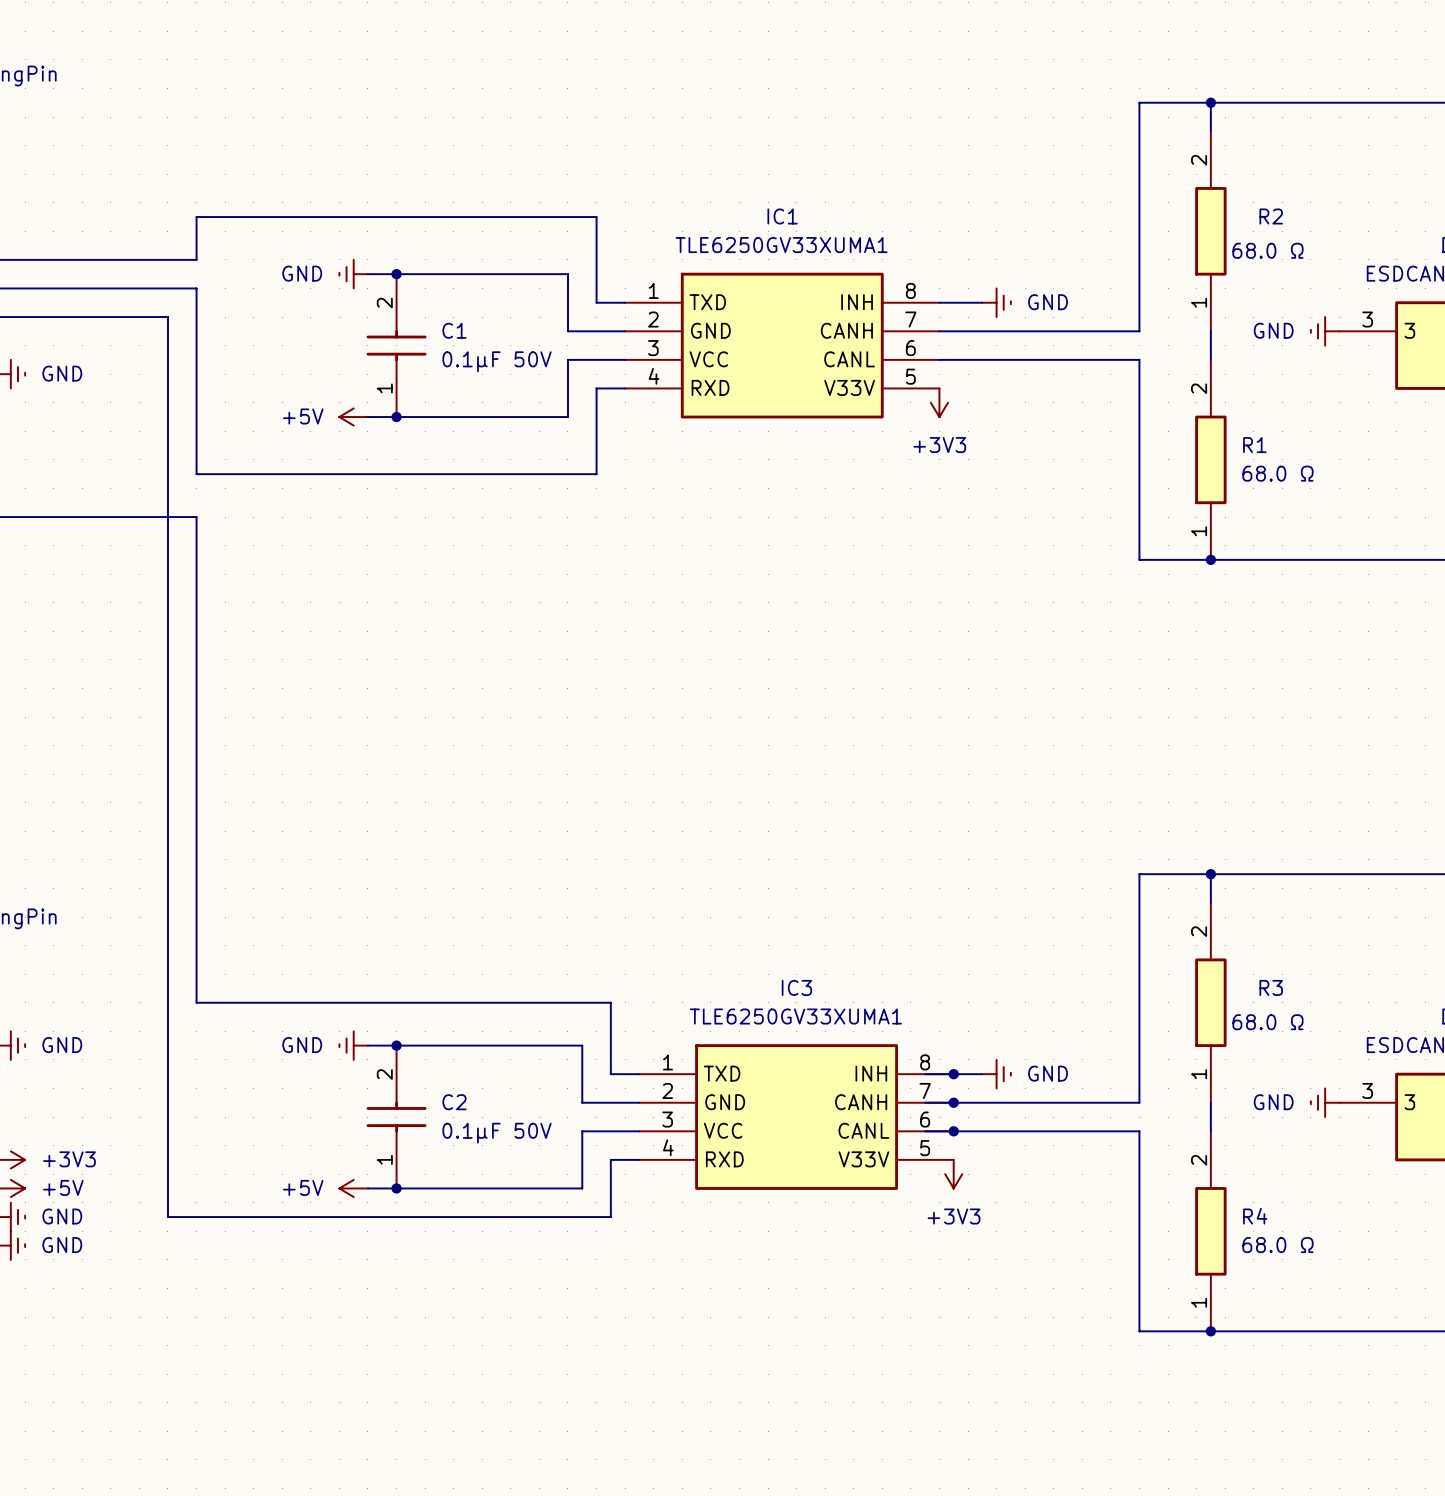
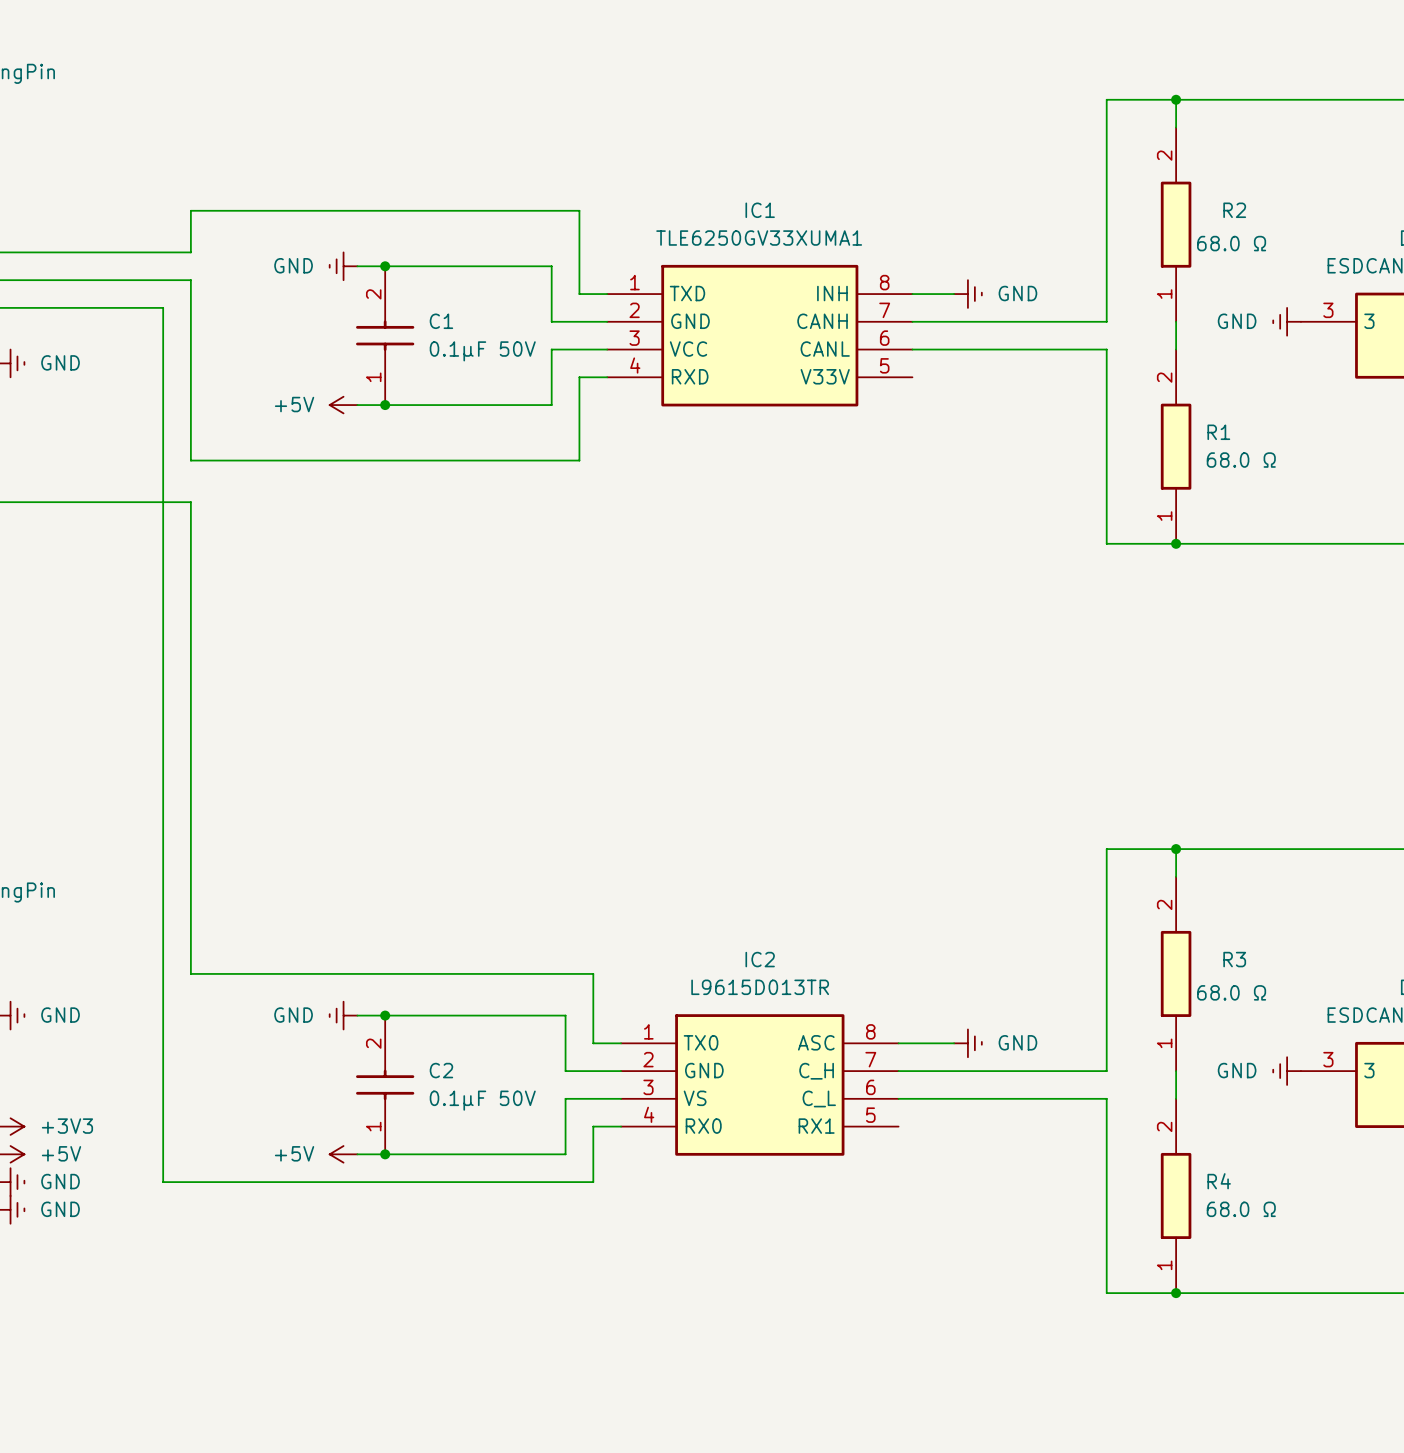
power symbol: +3V3 (939, 402) -> none
junction: (953, 1074) -> none
junction: (953, 1102) -> none
IC2: none -> L9615D013TR (759, 1084)
IC3: TLE6250GV33XUMA1 (796, 1117) -> none
junction: (953, 1131) -> none
power symbol: +3V3 (953, 1174) -> none

